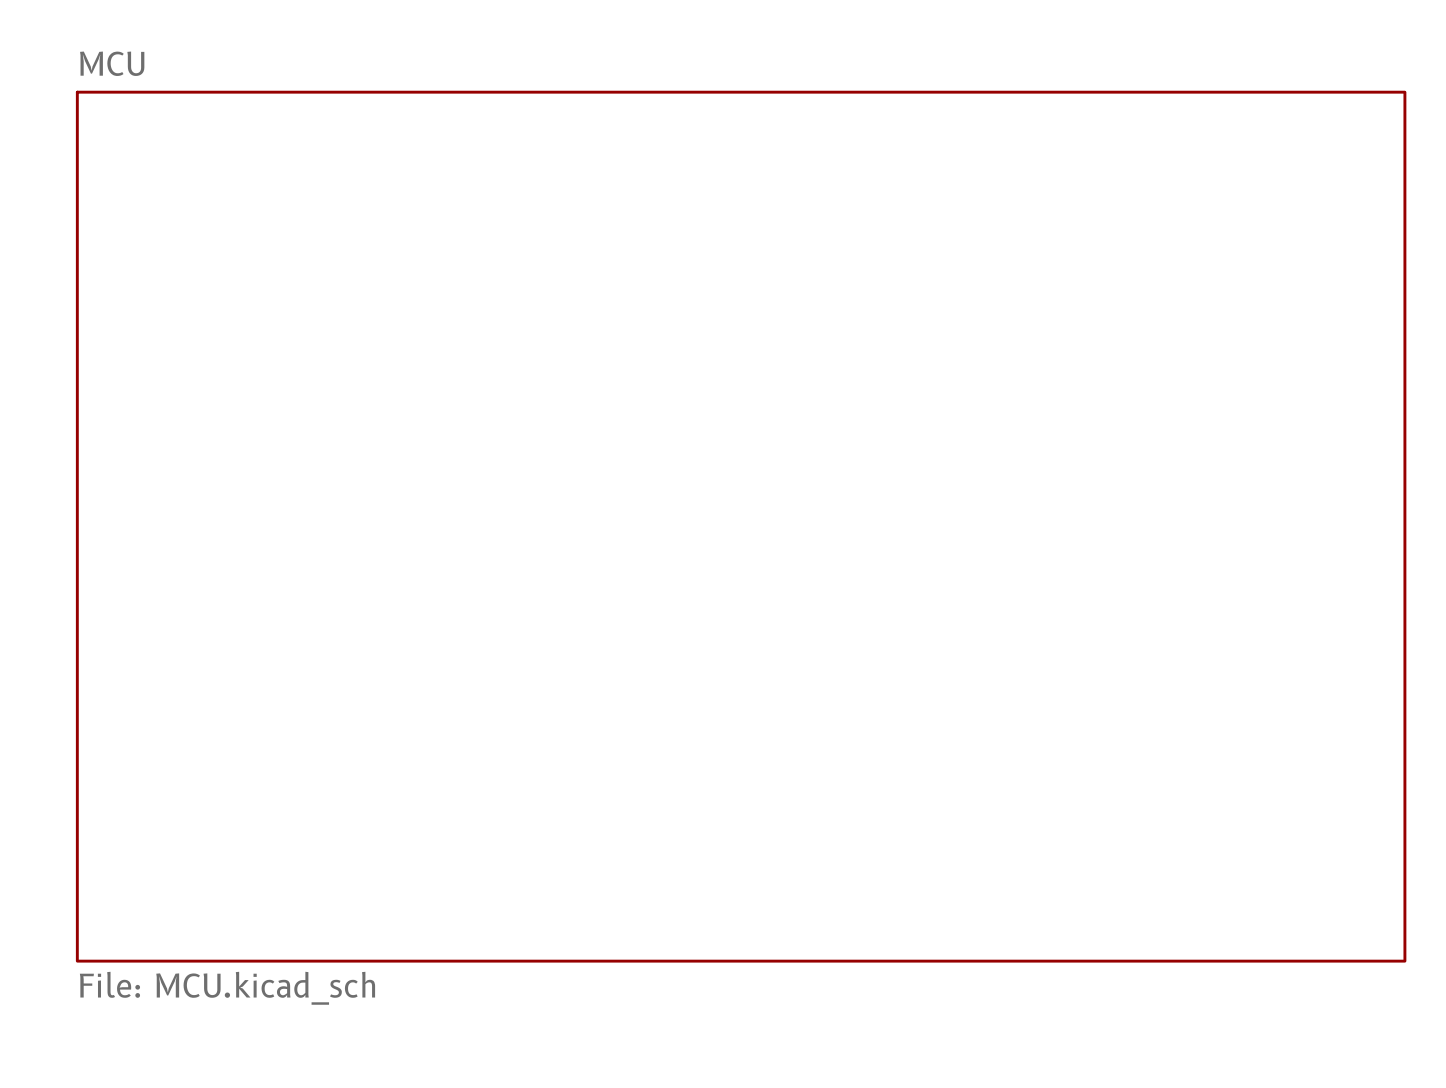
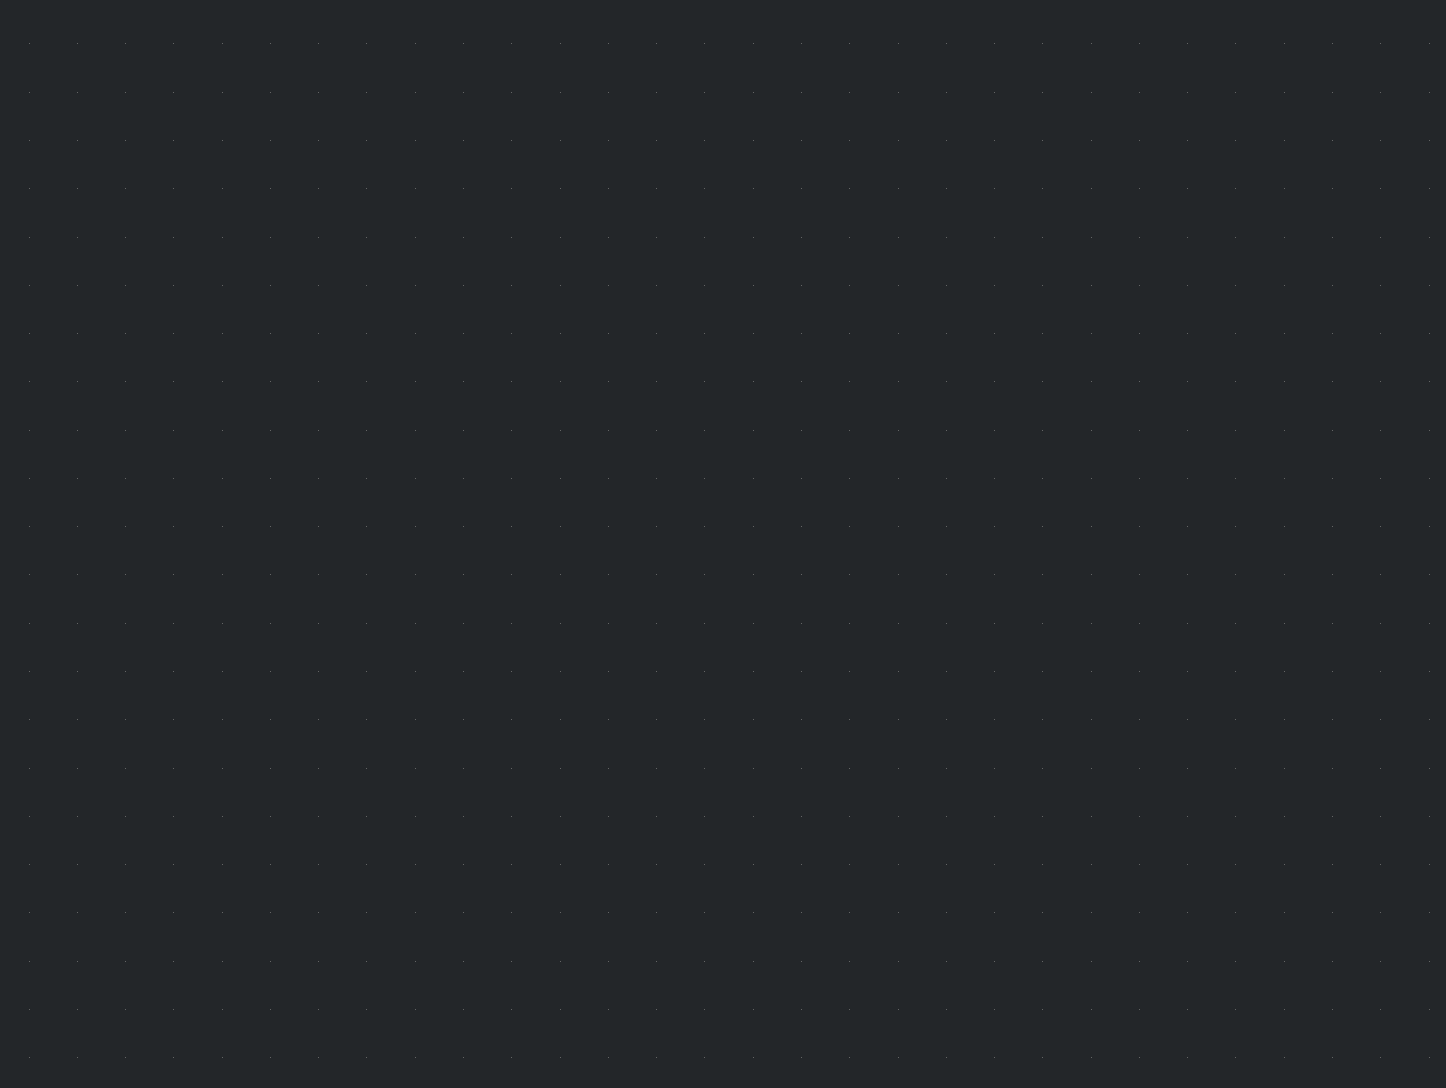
sheet MCU: File: MCU.kicad_sch (741, 526) -> none

